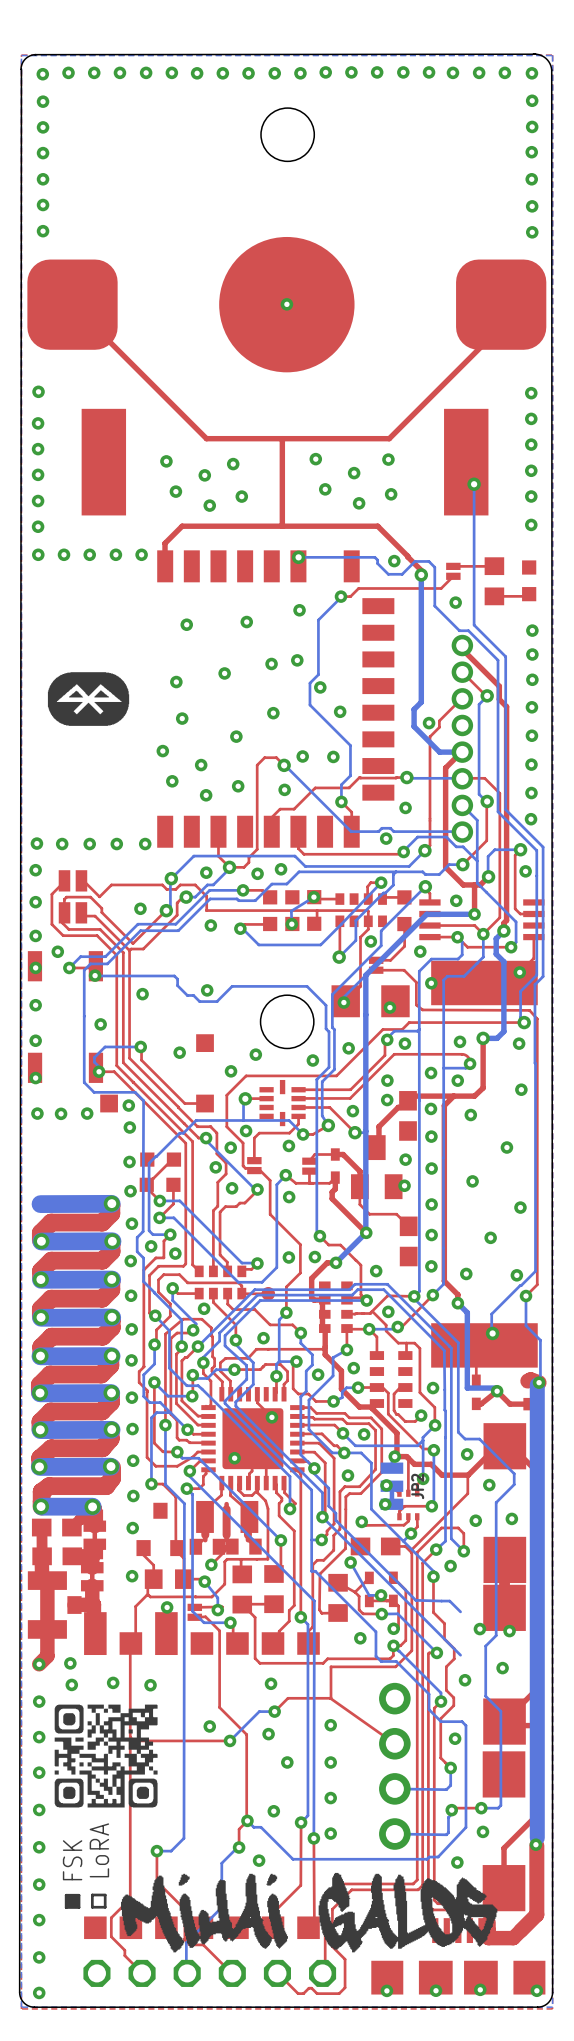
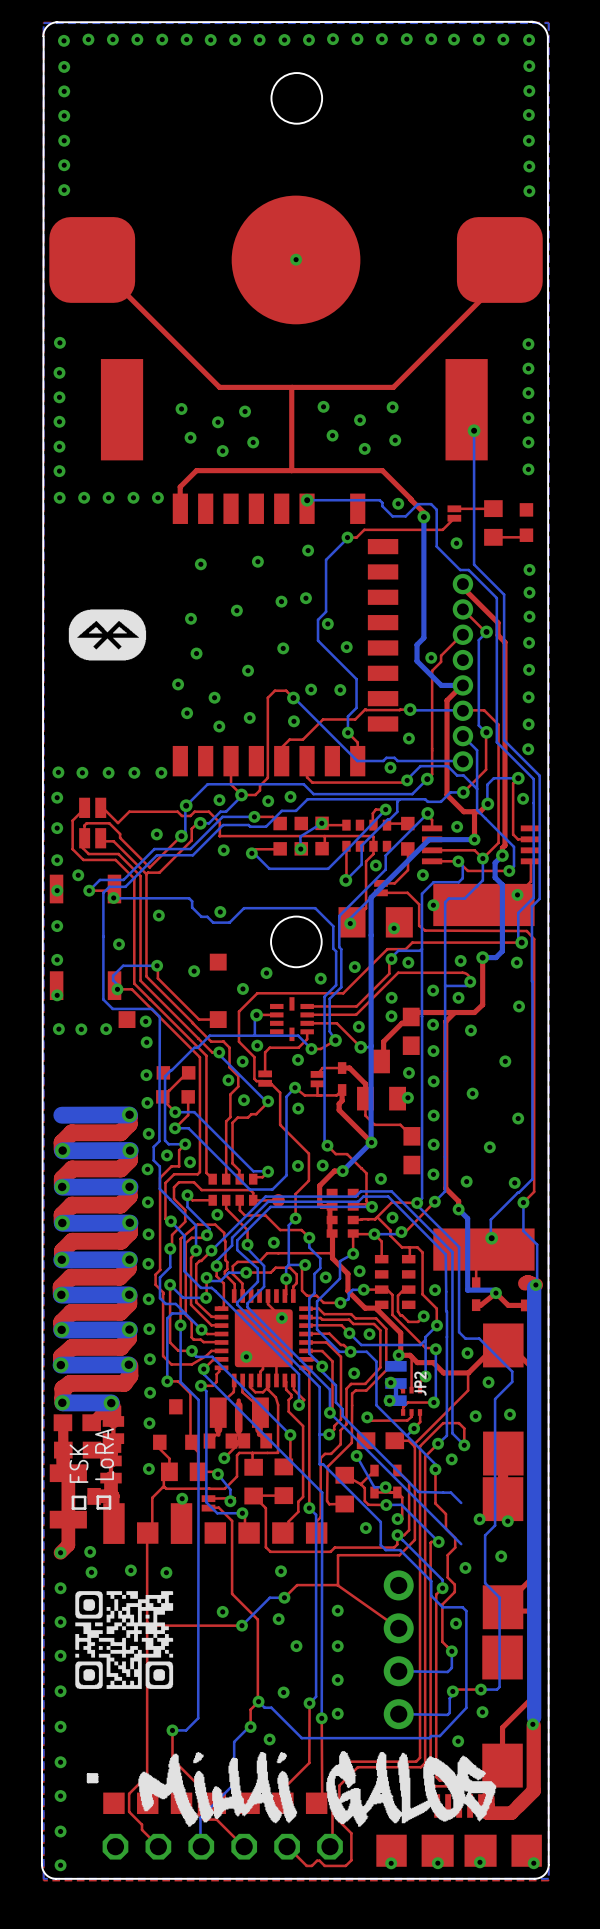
text position: LoRA (99, 1850) -> LoRA (104, 1454)
text position: FSK (72, 1860) -> FSK (79, 1463)
line: (105, 1894) (92, 1894) (92, 1907) (105, 1907) (105, 1895) -> (110, 1496) (97, 1496) (97, 1508) (110, 1508) (110, 1496)
line: (79, 1895) (66, 1895) (66, 1907) (79, 1907) (79, 1895) -> (85, 1496) (72, 1496) (72, 1508) (85, 1508) (85, 1497)

